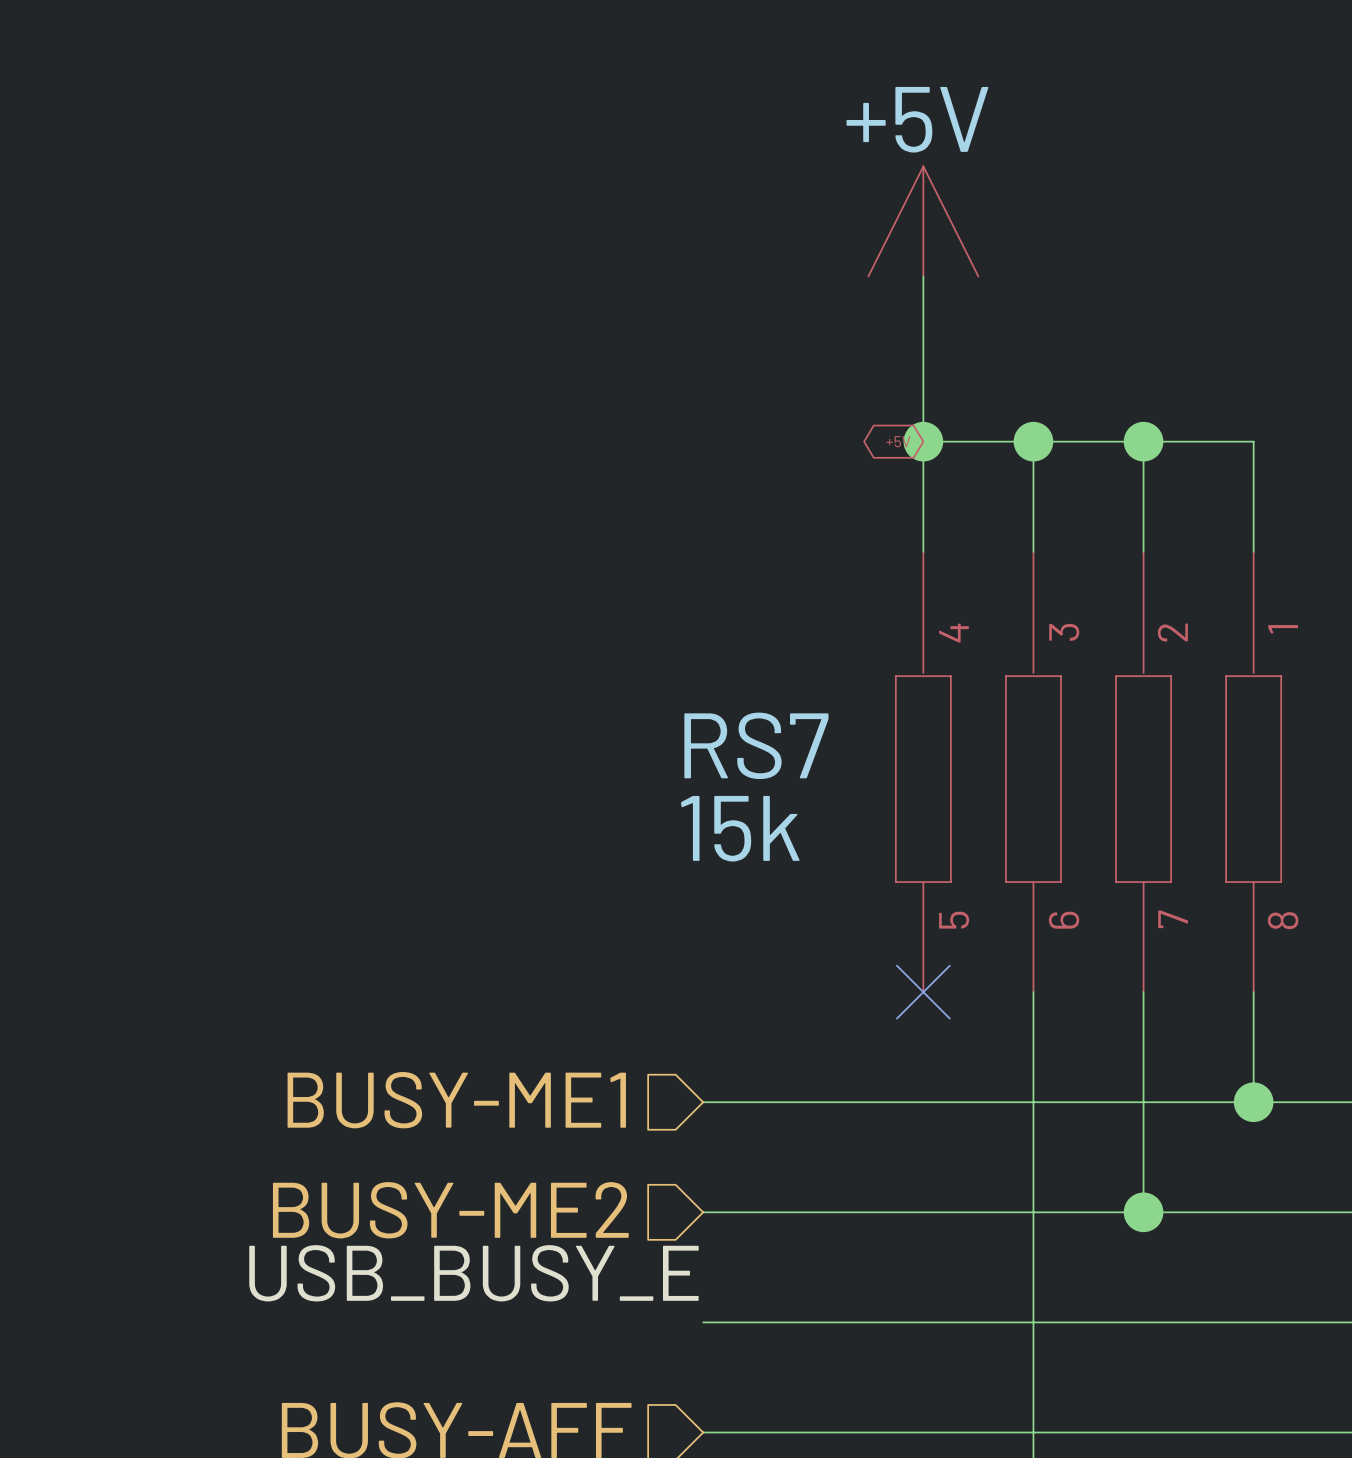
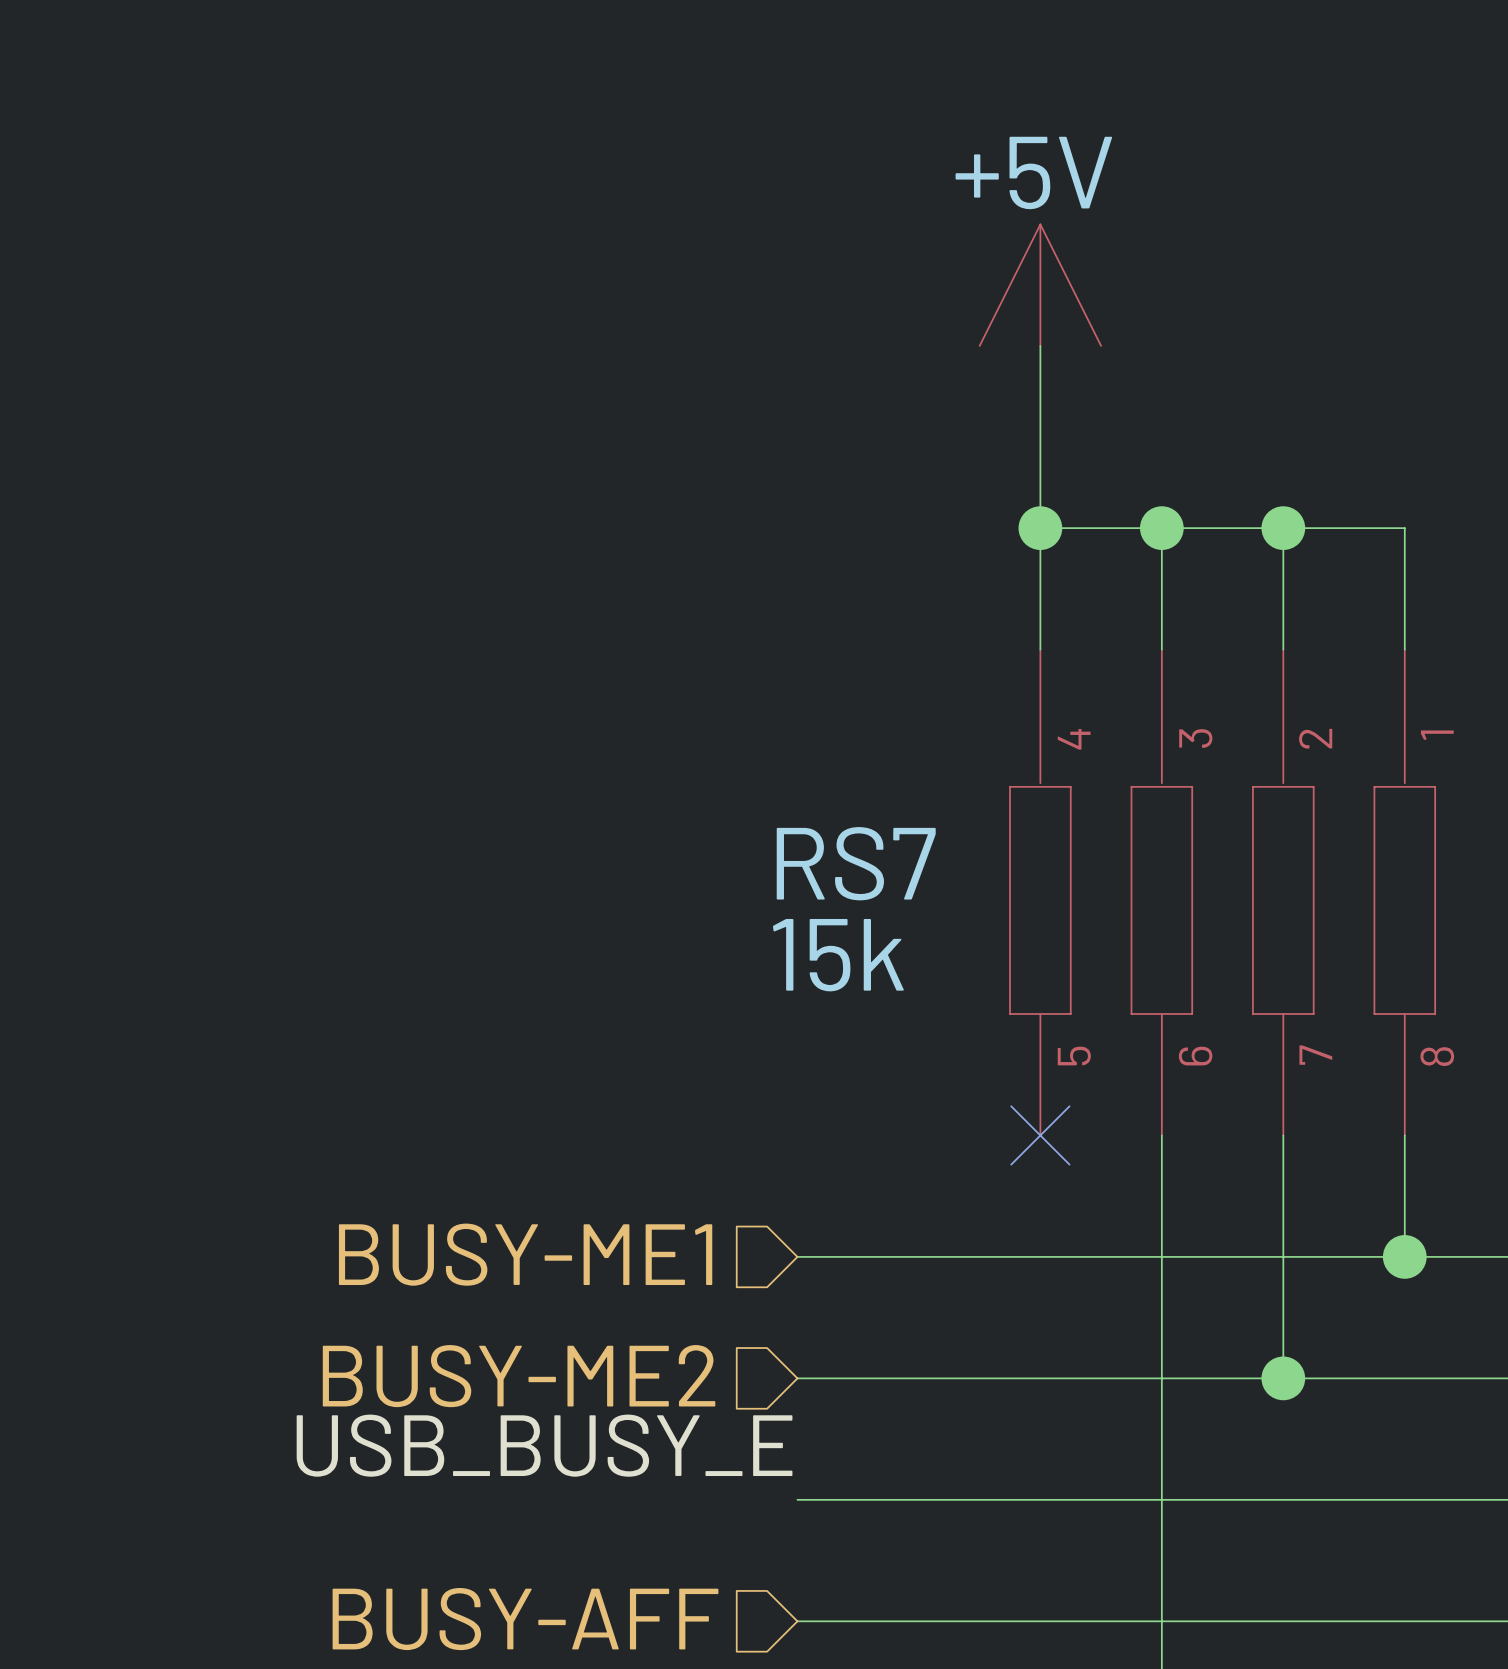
global label: +5V (898, 441) -> none

